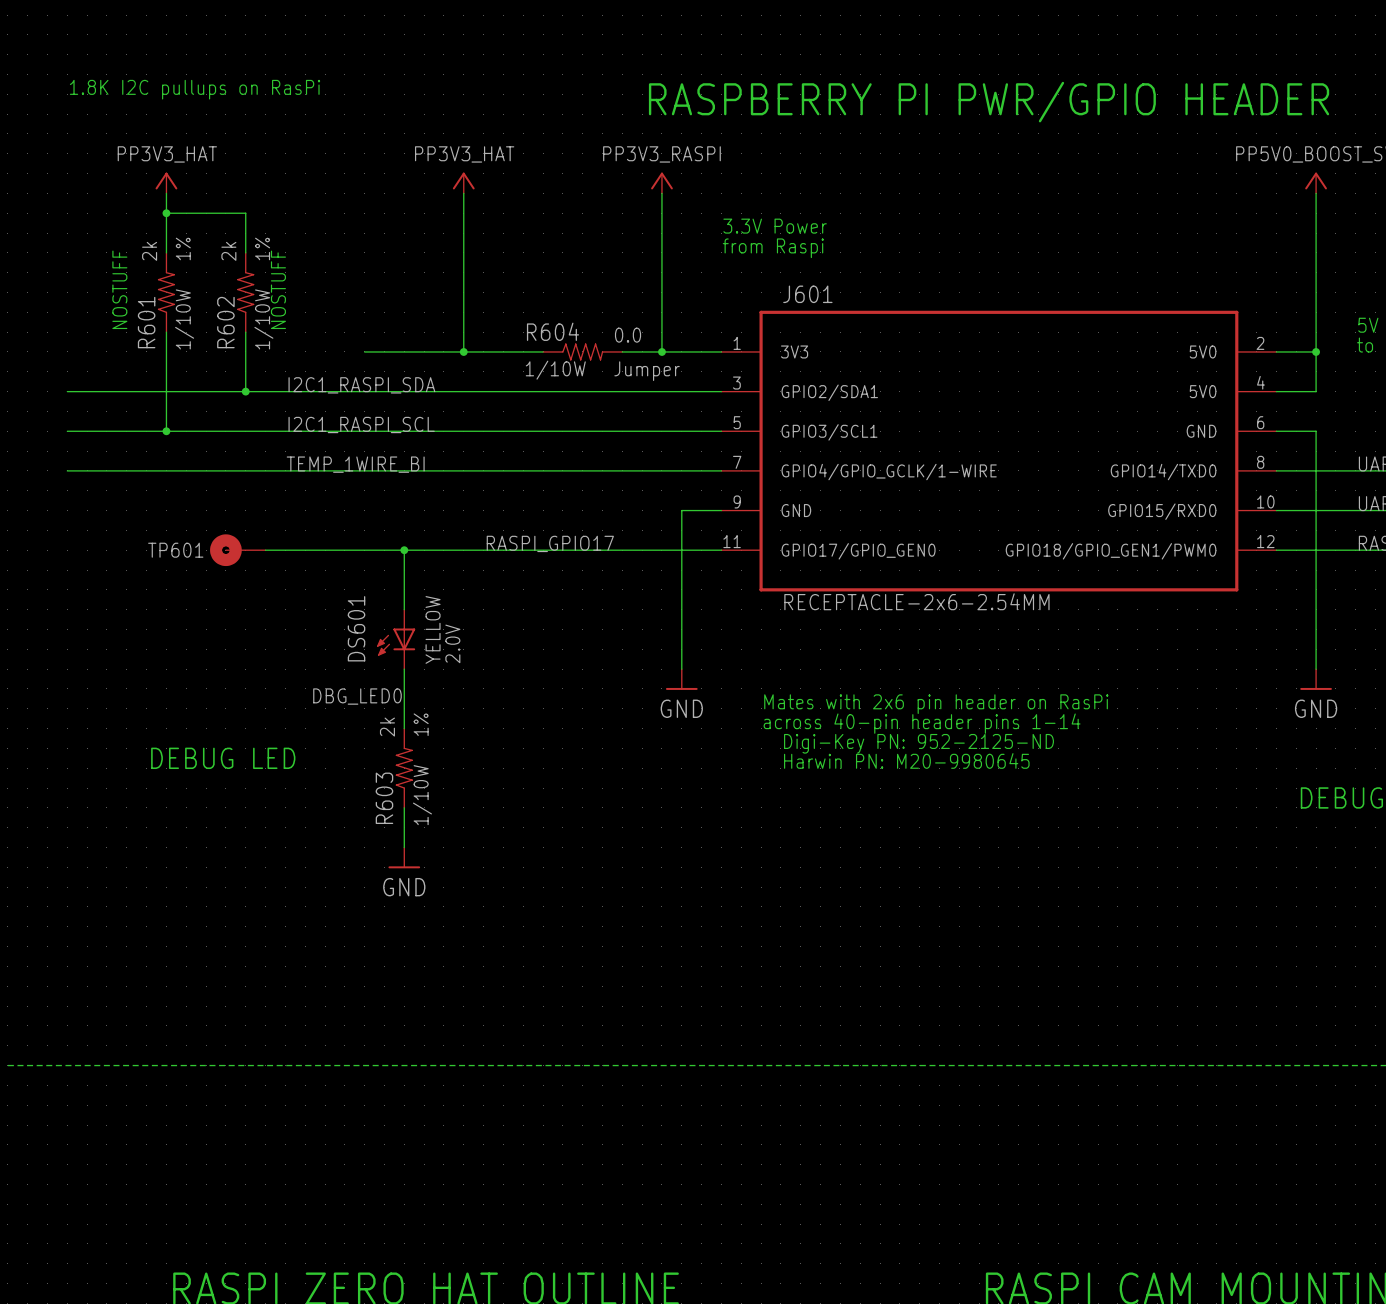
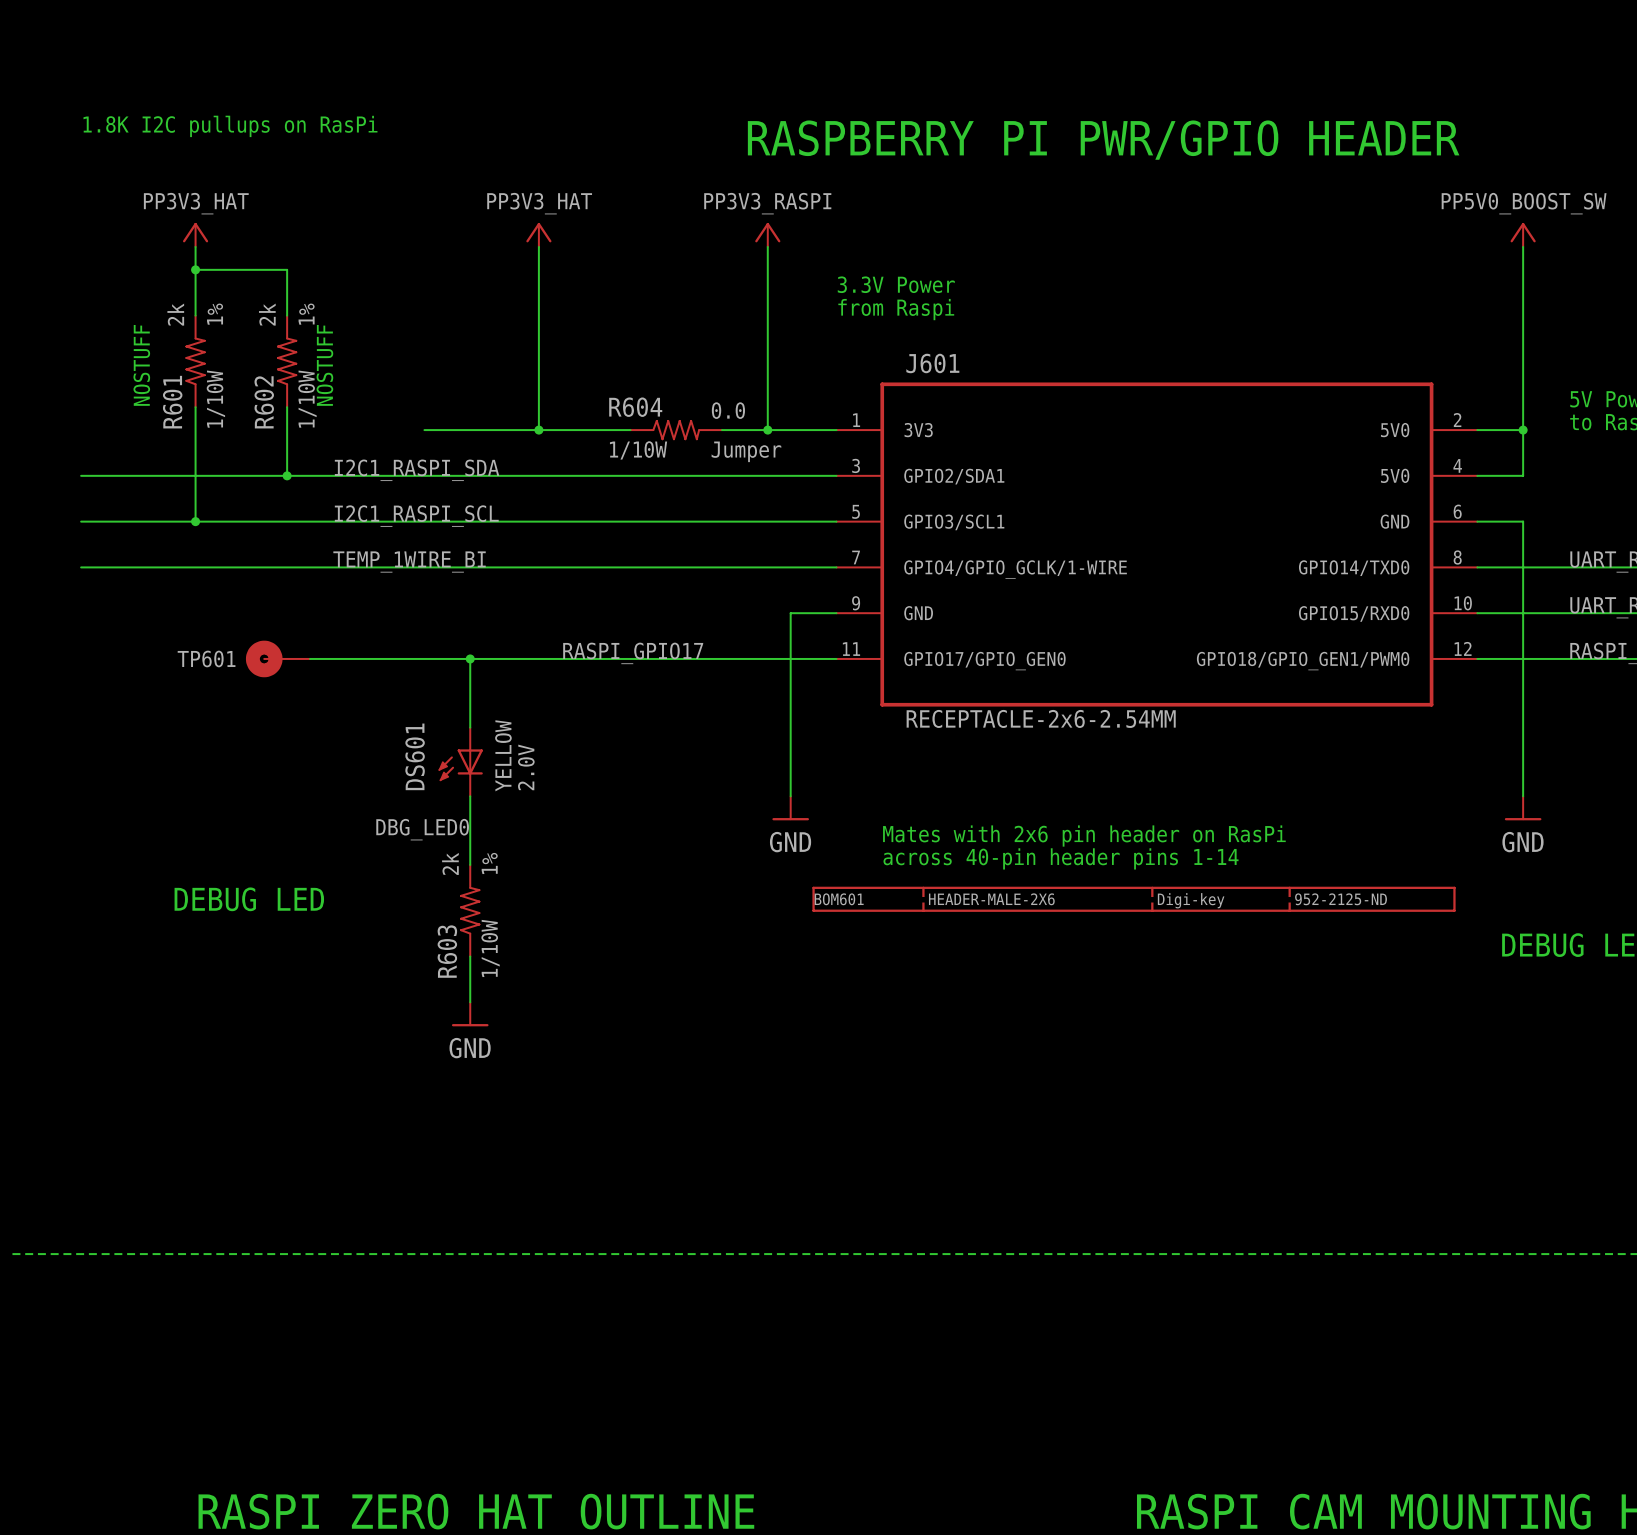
text: Digi-Key PN: 952-2125-ND (918, 743) -> none
BOM601: none -> HEADER-MALE-2X6 (1134, 899)
text: Harwin PN: M20-9980645 (906, 760) -> none

